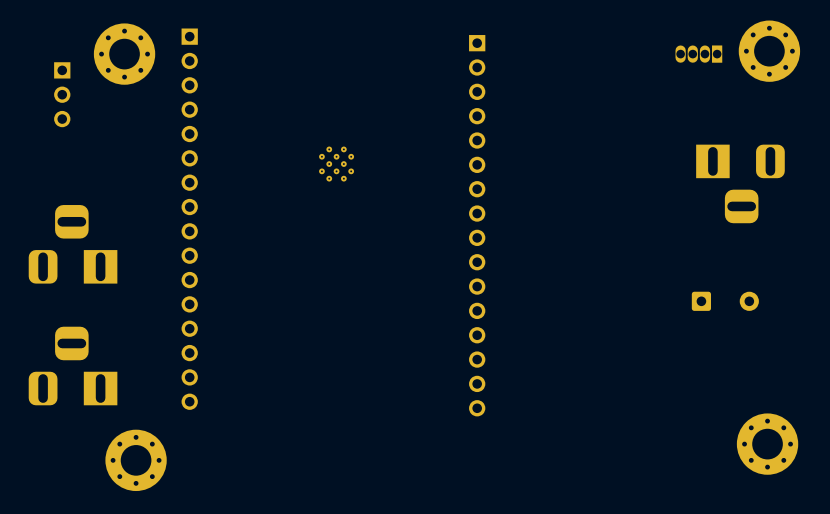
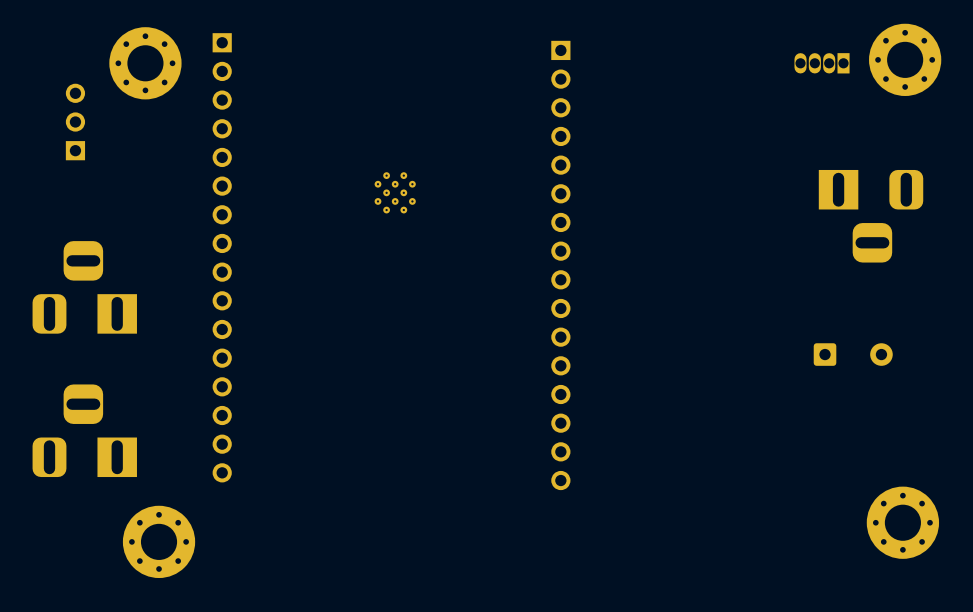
part rotation: 0° (62, 94) -> 180° (75, 121)

